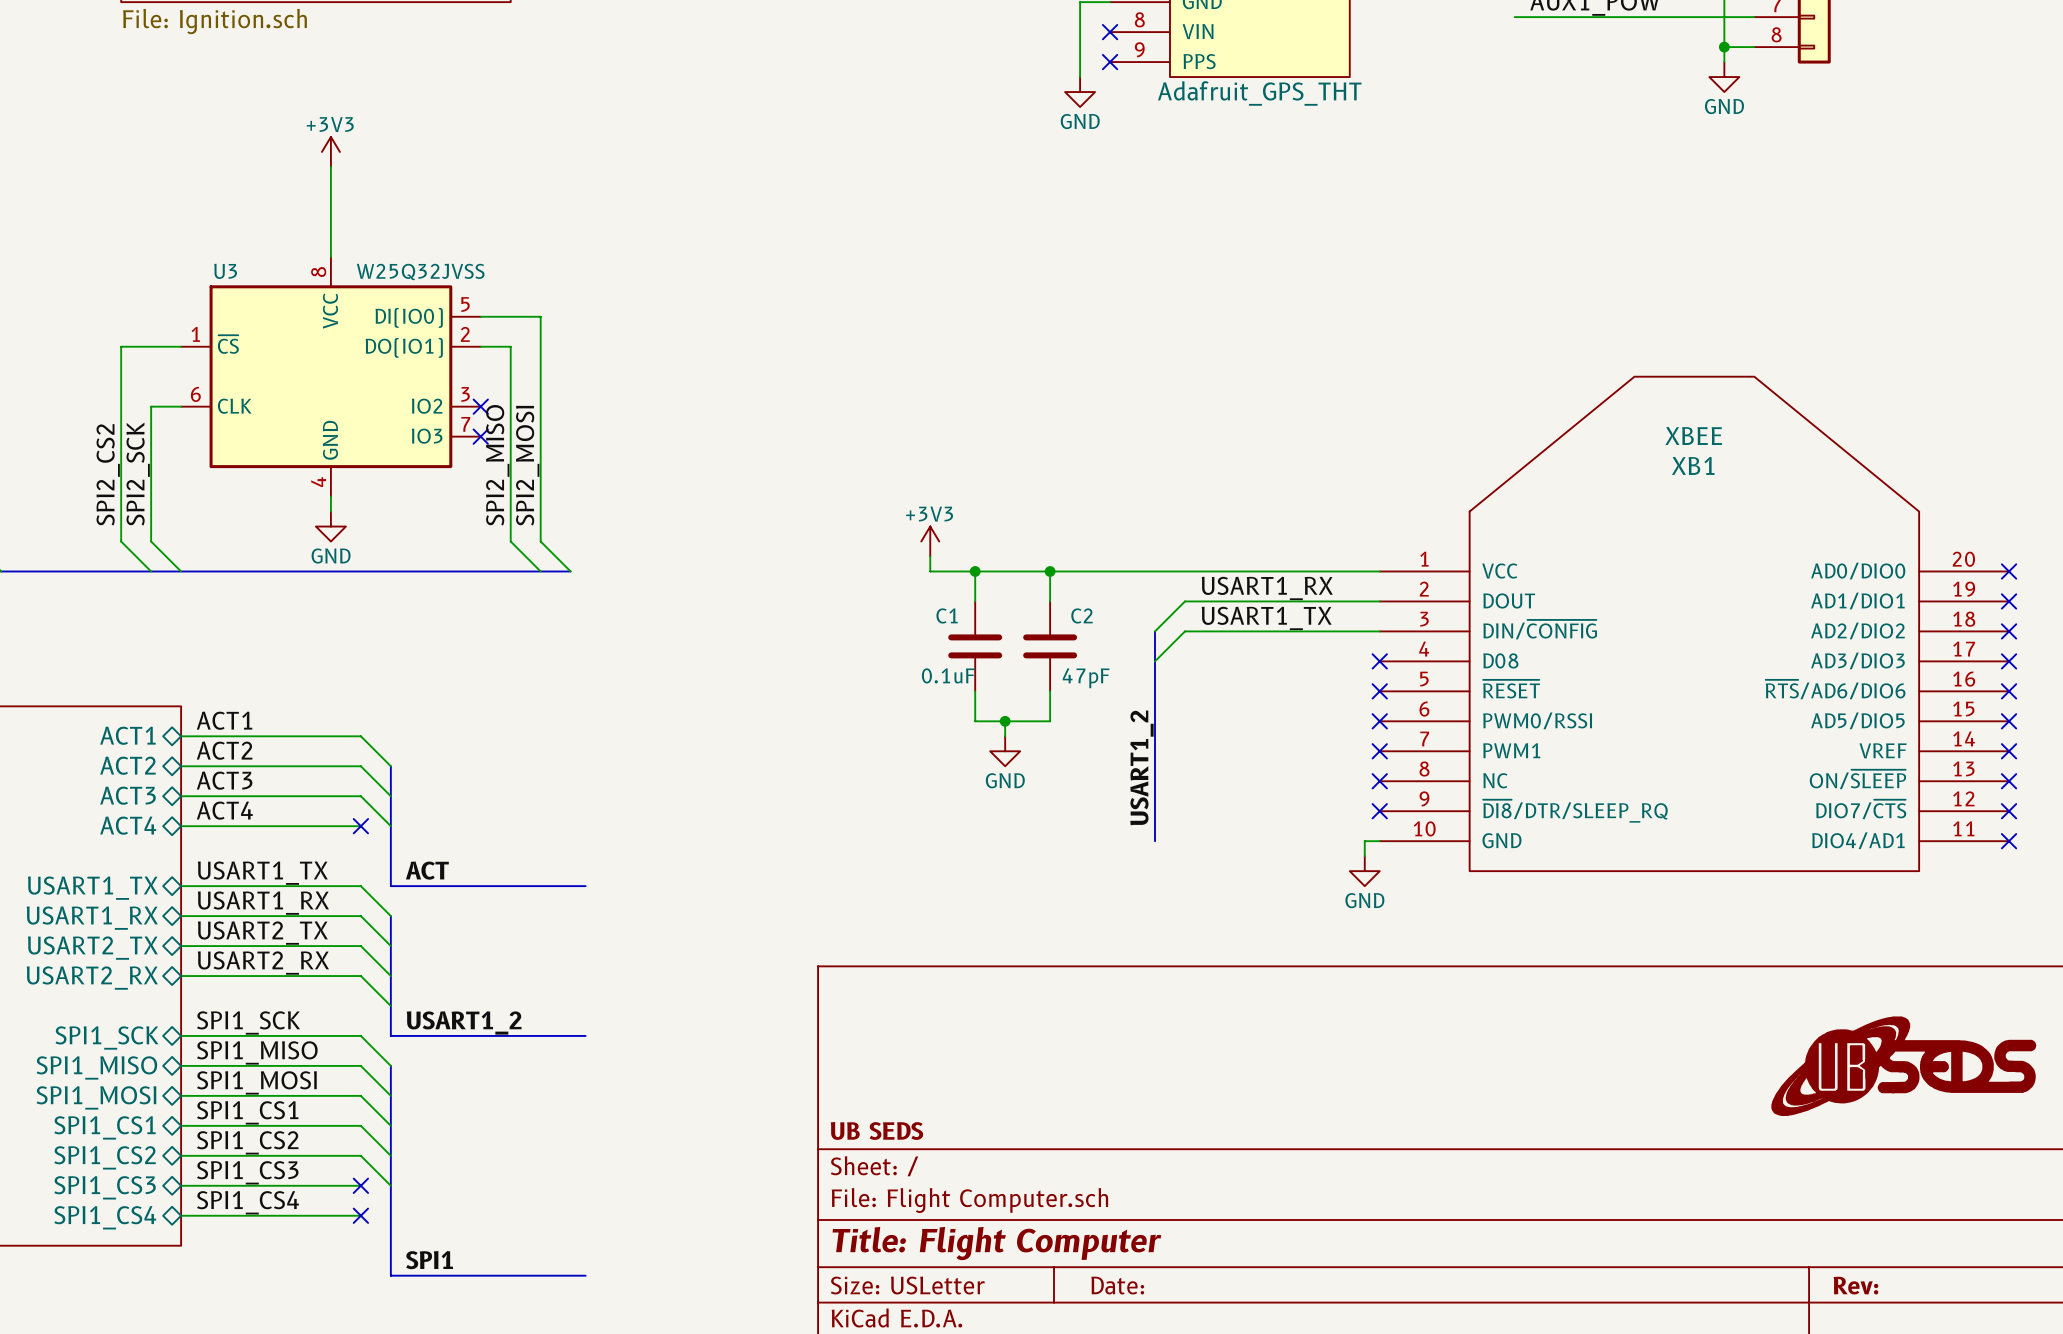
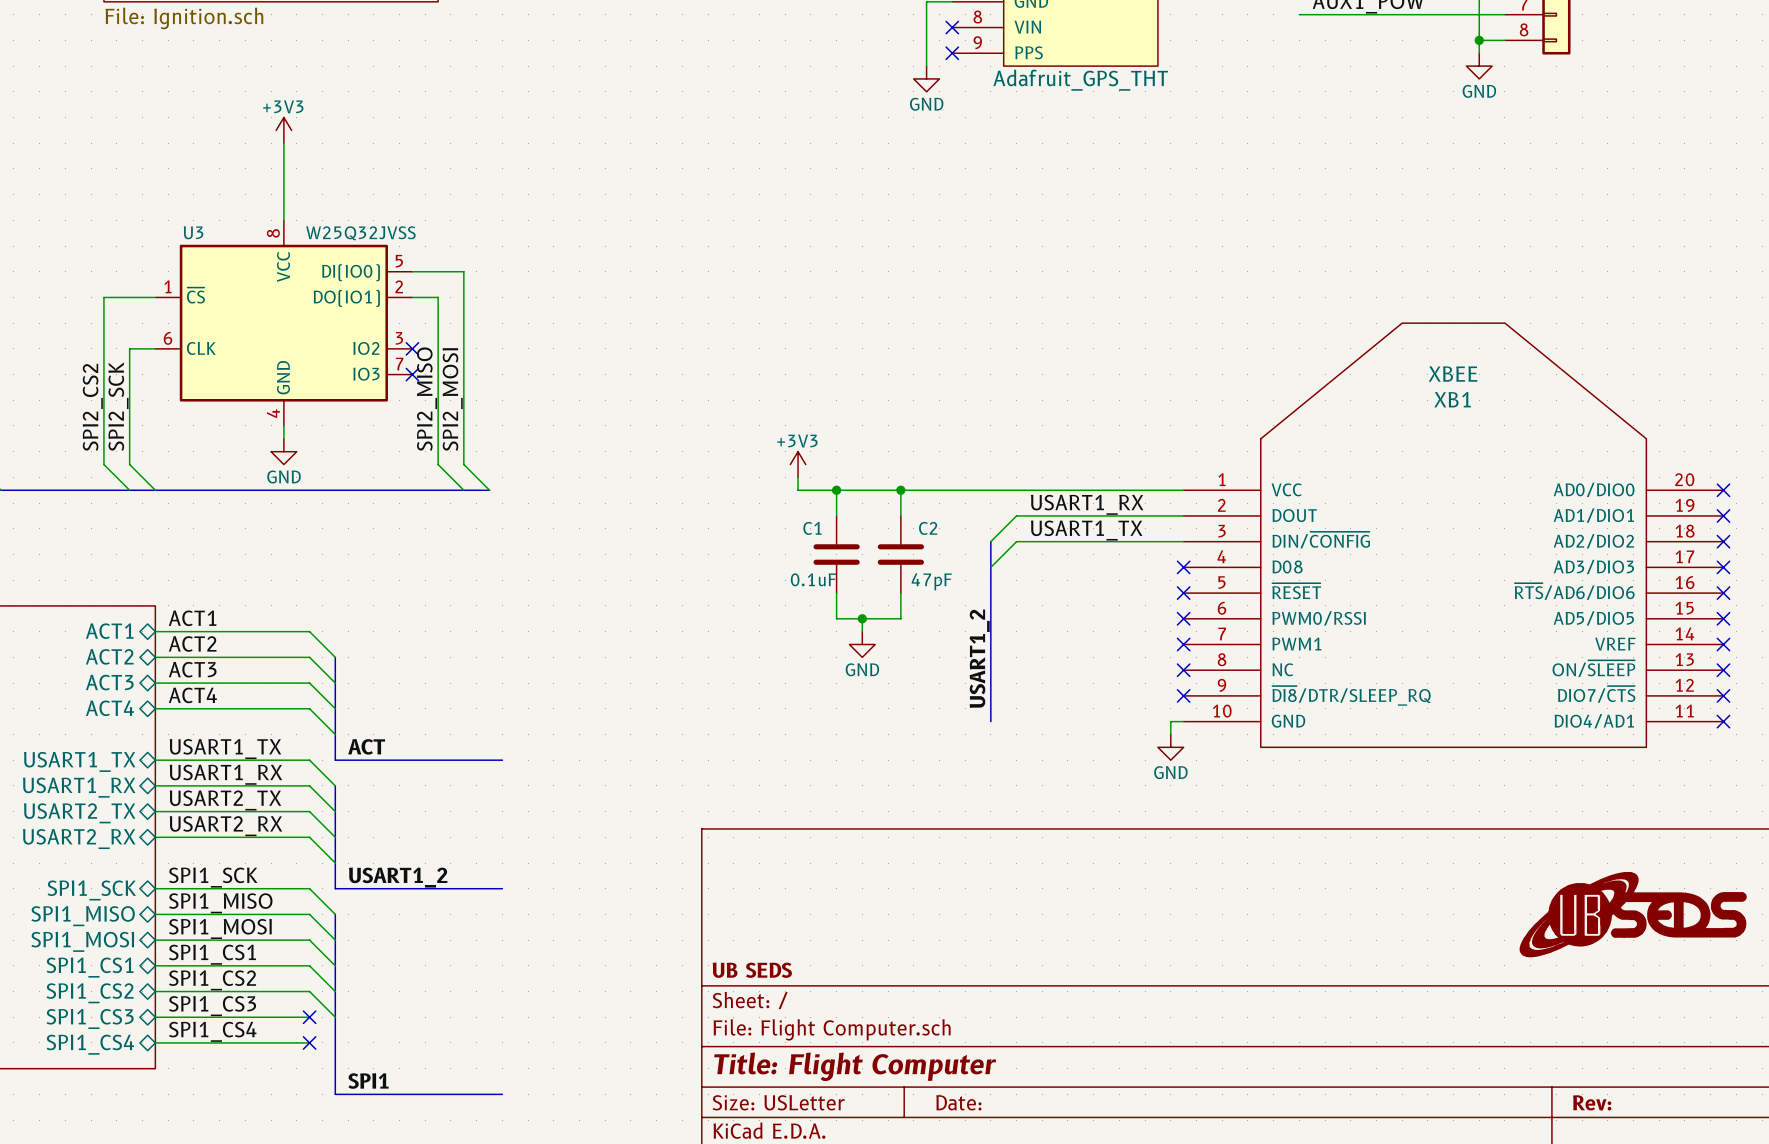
wire: none -> (309, 708) (335, 734)
no-connect mark: (360, 826) -> none

